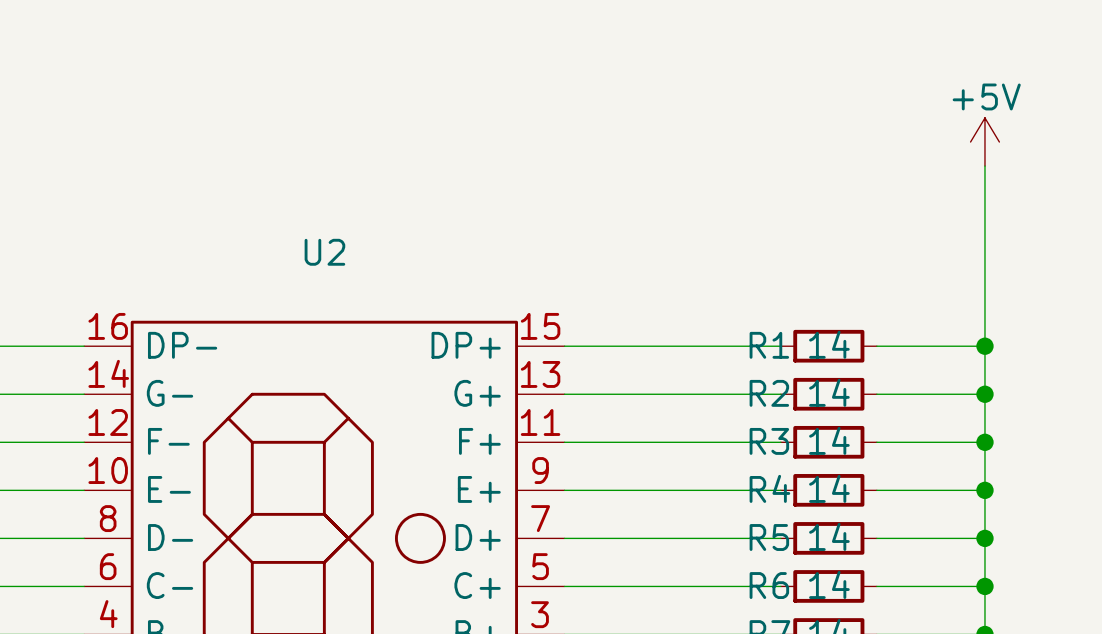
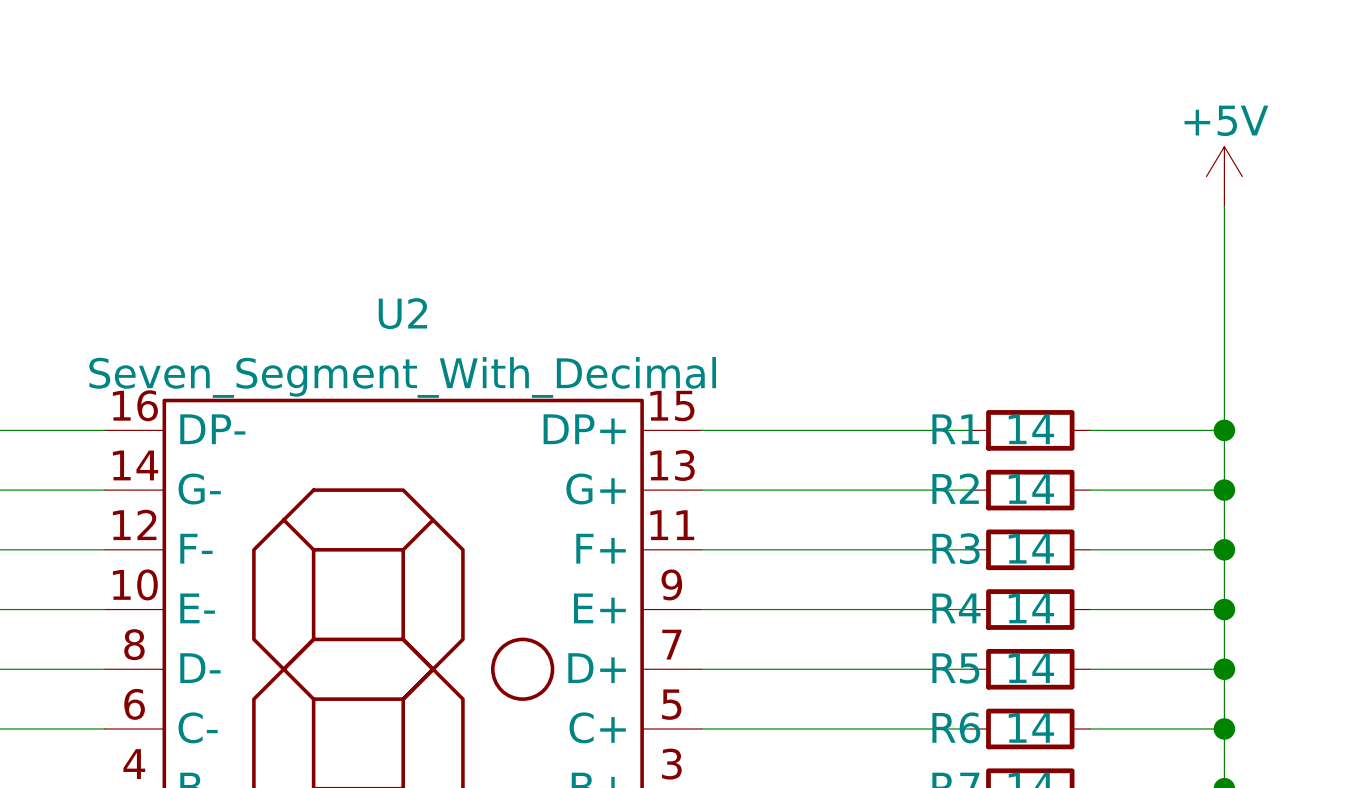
U2 value: none -> Seven_Segment_With_Decimal (402, 377)

